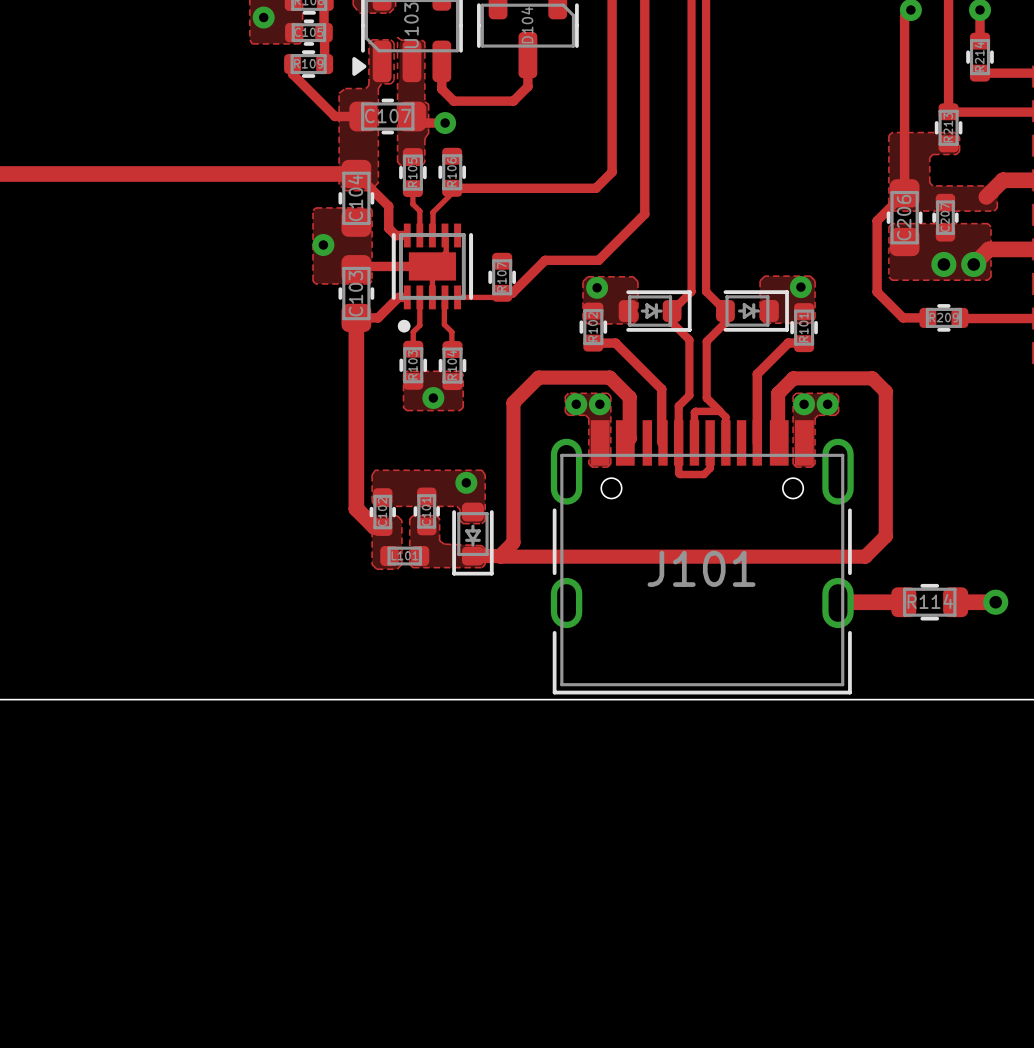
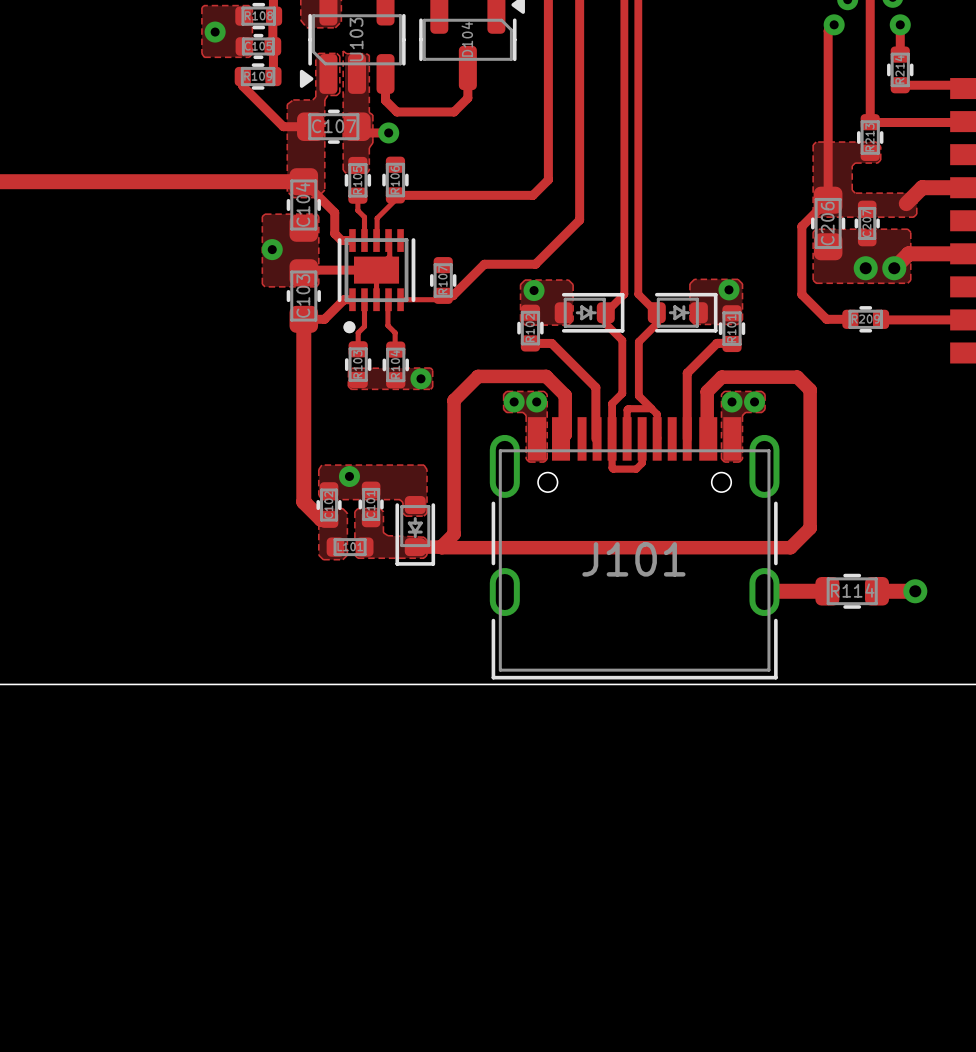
zone outline: none -> (430, 368) (432, 370) (432, 387) (430, 389) (351, 389) (348, 386) (348, 371) (350, 368) (430, 368)
zone outline: (406, 371) (403, 374) (403, 407) (406, 410) (460, 410) (463, 407) (463, 374) (460, 371) (406, 371) -> none
via: none -> (420, 378)
via: (433, 398) -> none
via: none -> (349, 476)
via: (466, 482) -> none

